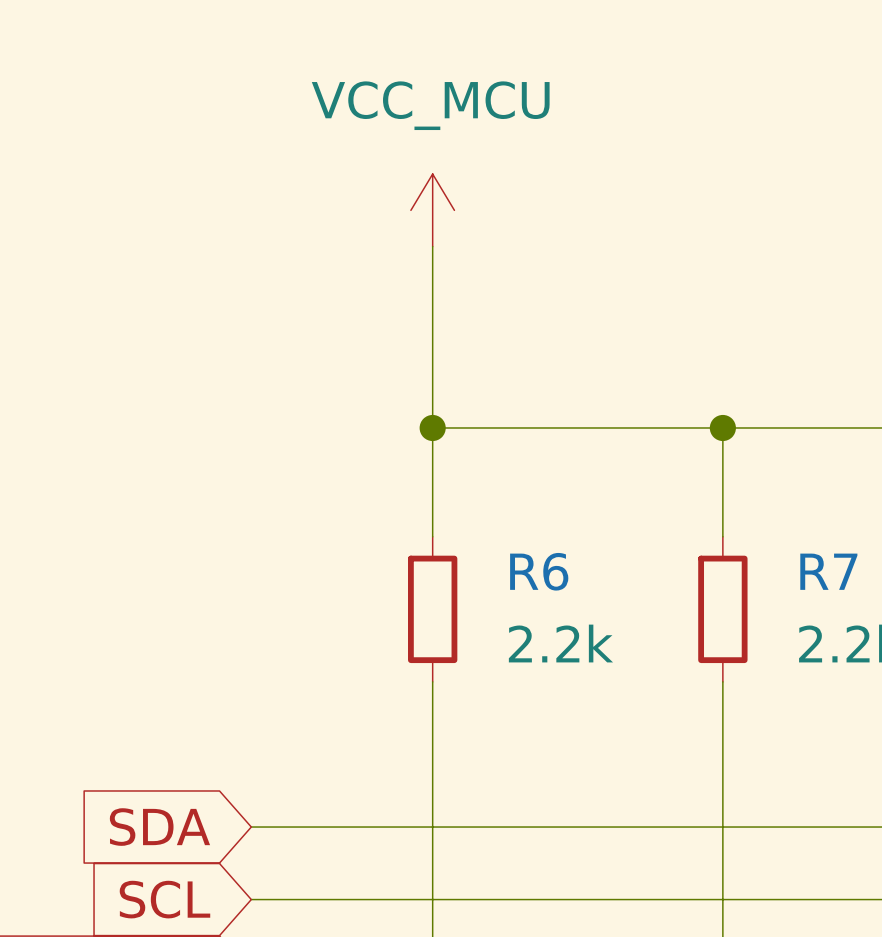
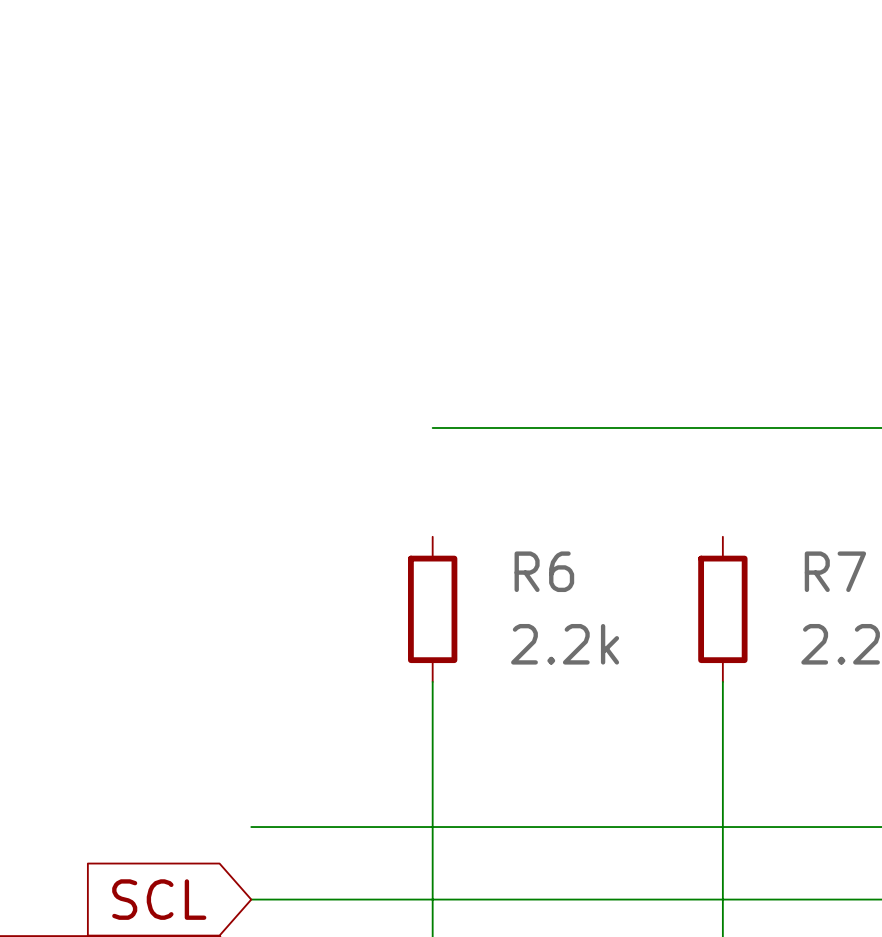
power symbol: VCC_MCU (432, 210) -> none
wire: (432, 246) (432, 536) -> none
junction: (432, 427) -> none
wire: (722, 427) (722, 536) -> none
junction: (722, 427) -> none
global label: SDA (159, 827) -> none

